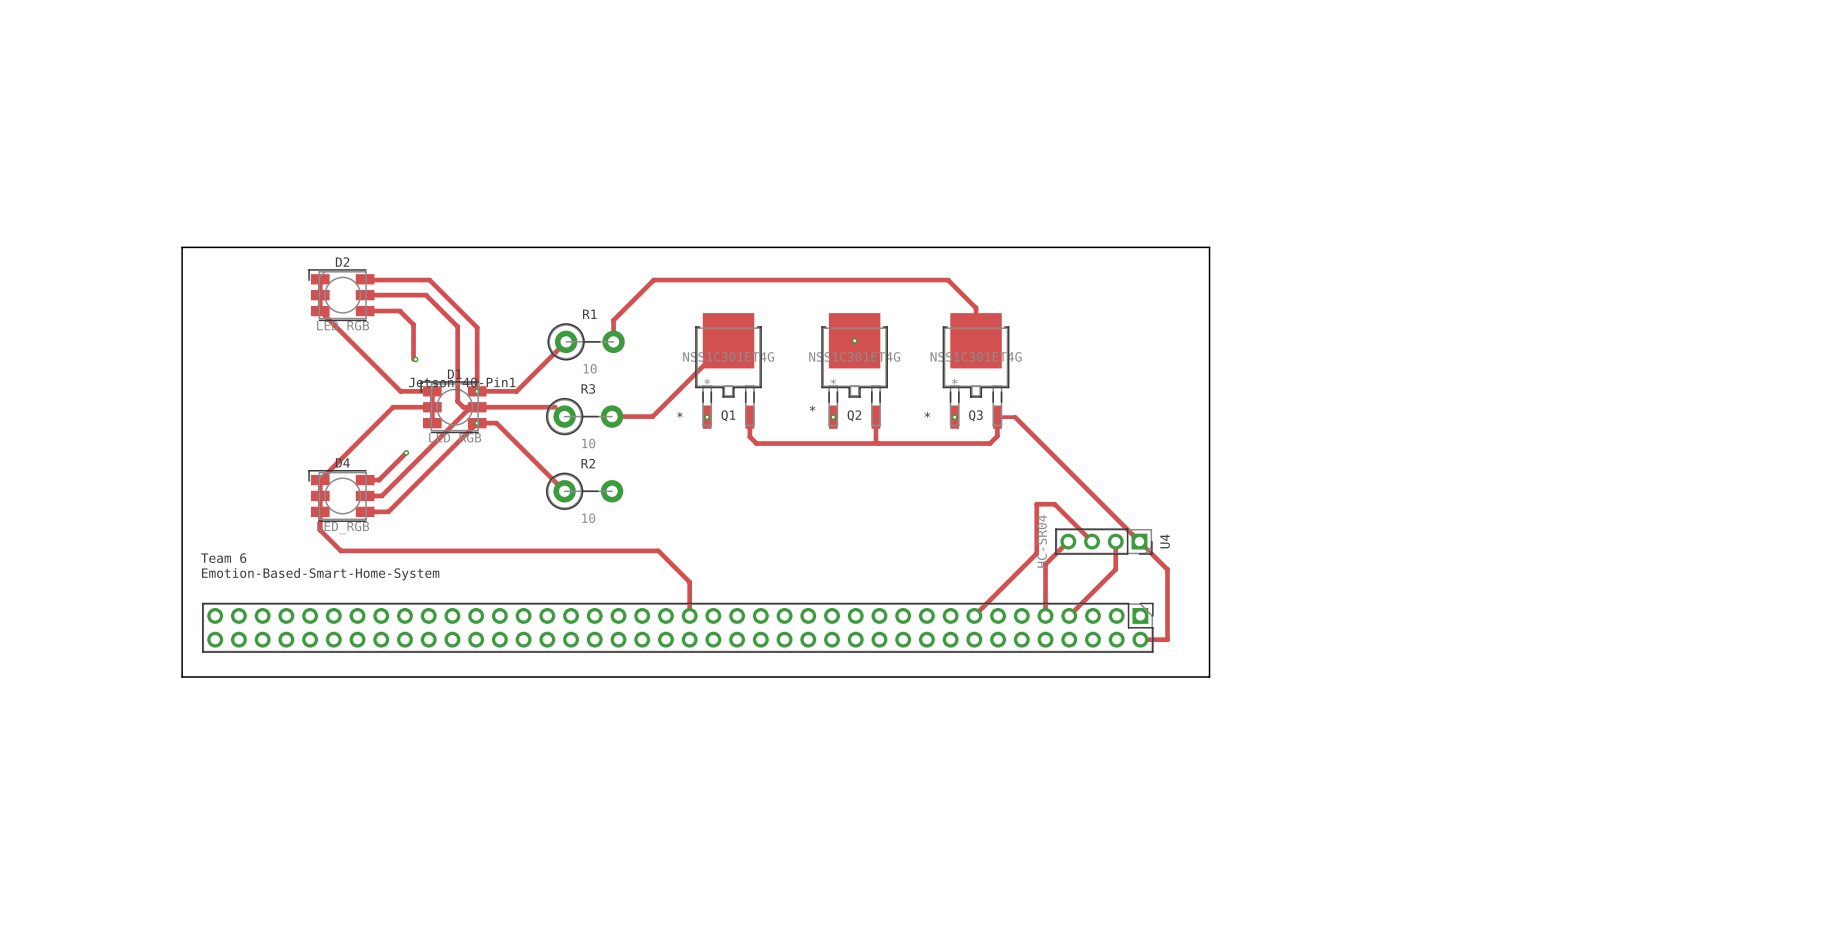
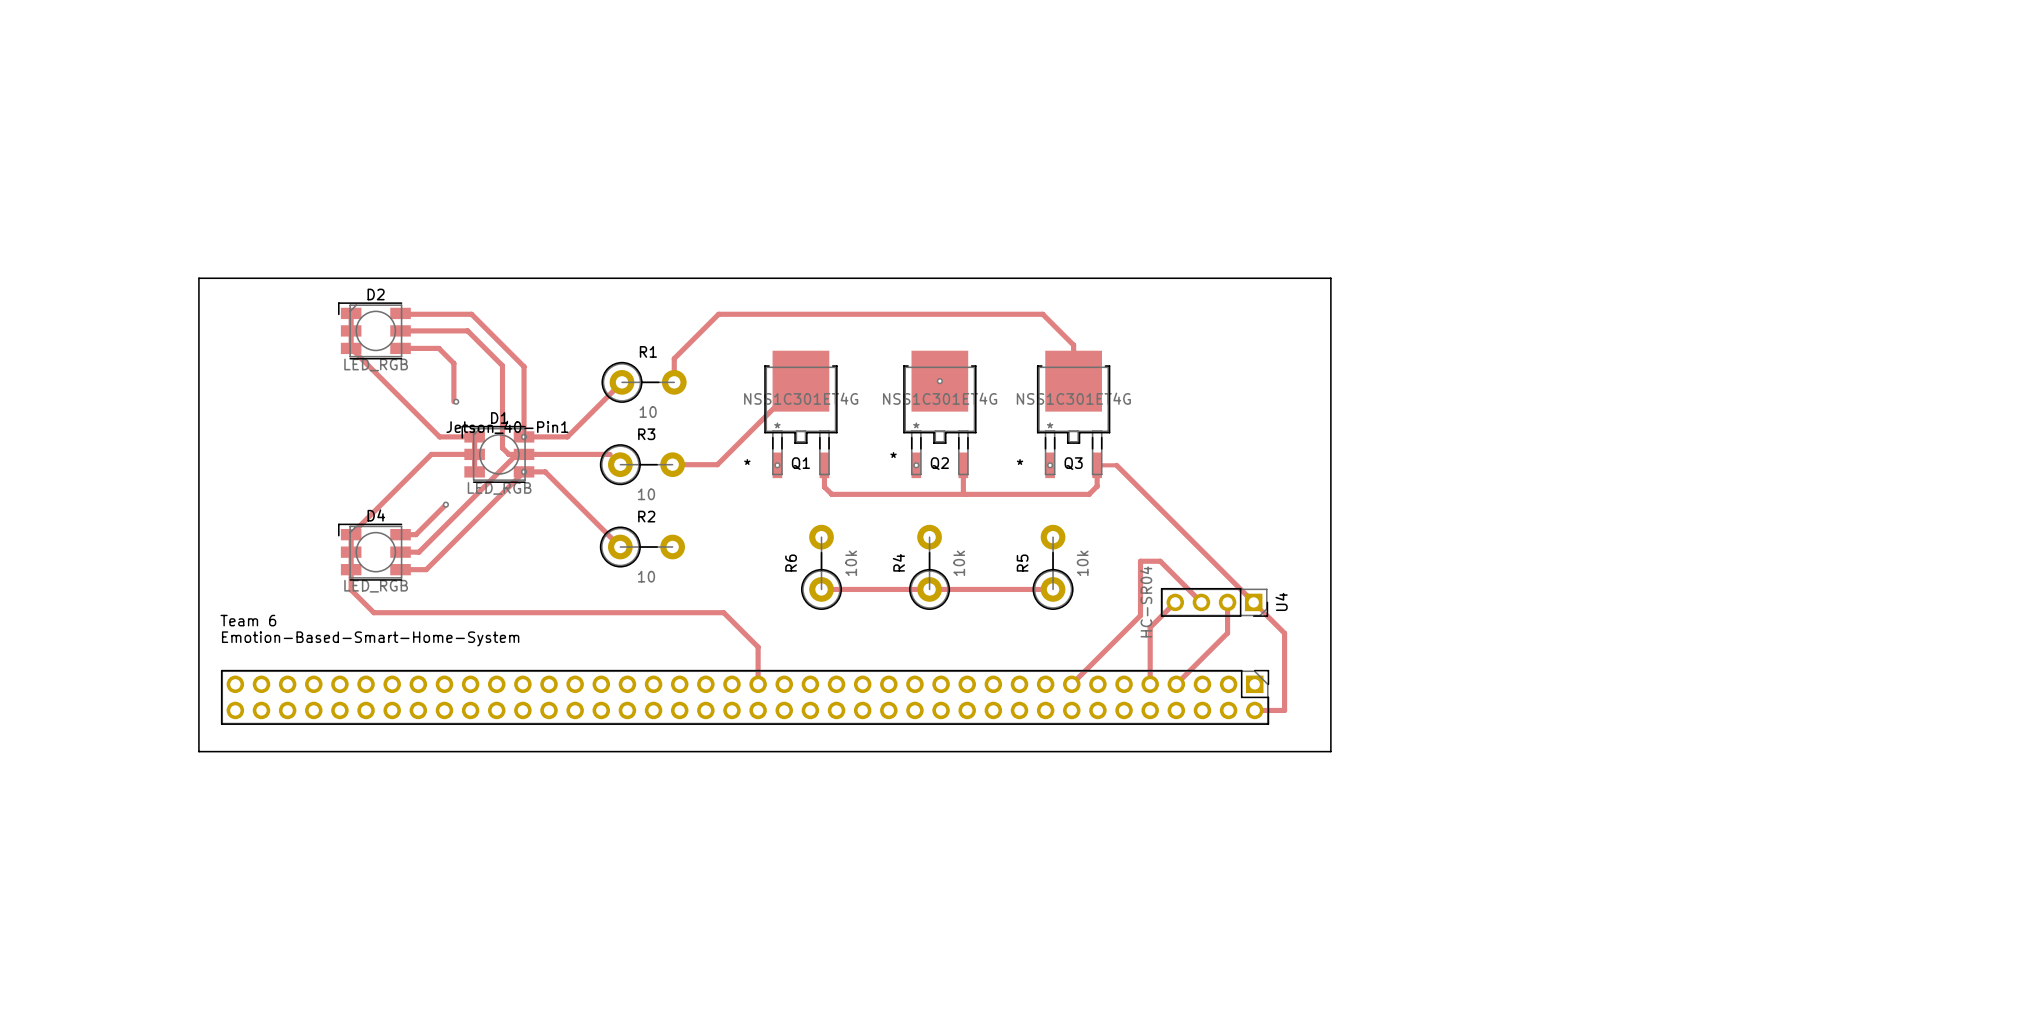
R6: none -> 10k (821, 567)
R4: none -> 10k (929, 567)
R5: none -> 10k (1053, 567)
track: none -> (821, 589) (1053, 589)

